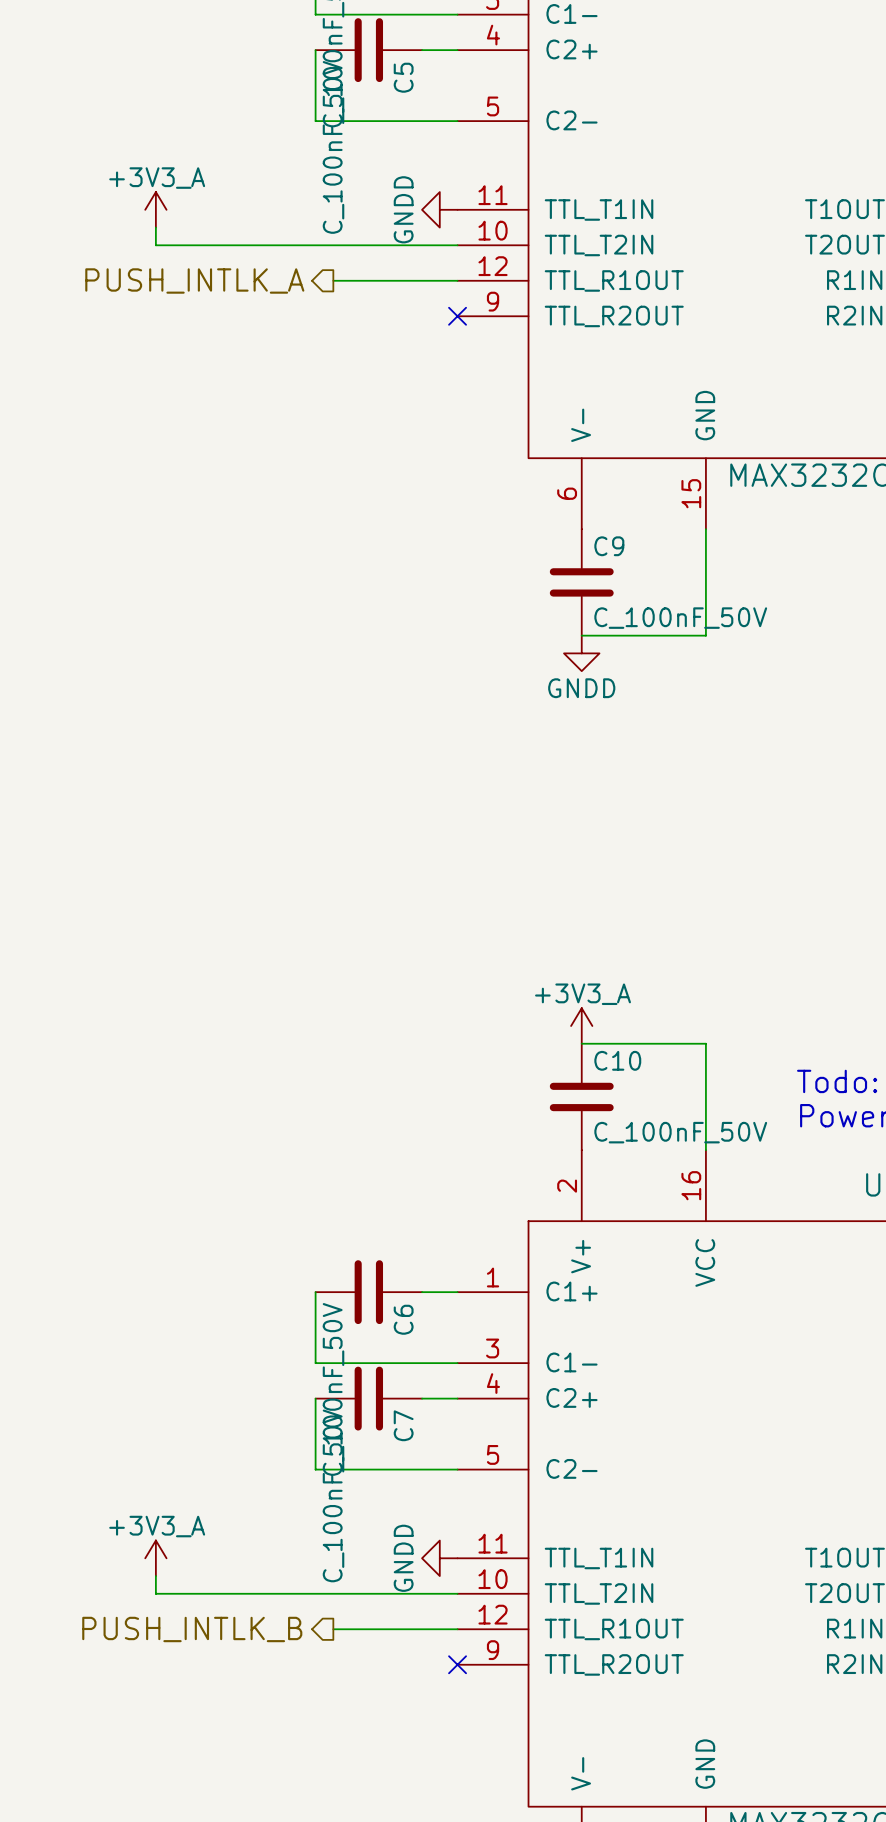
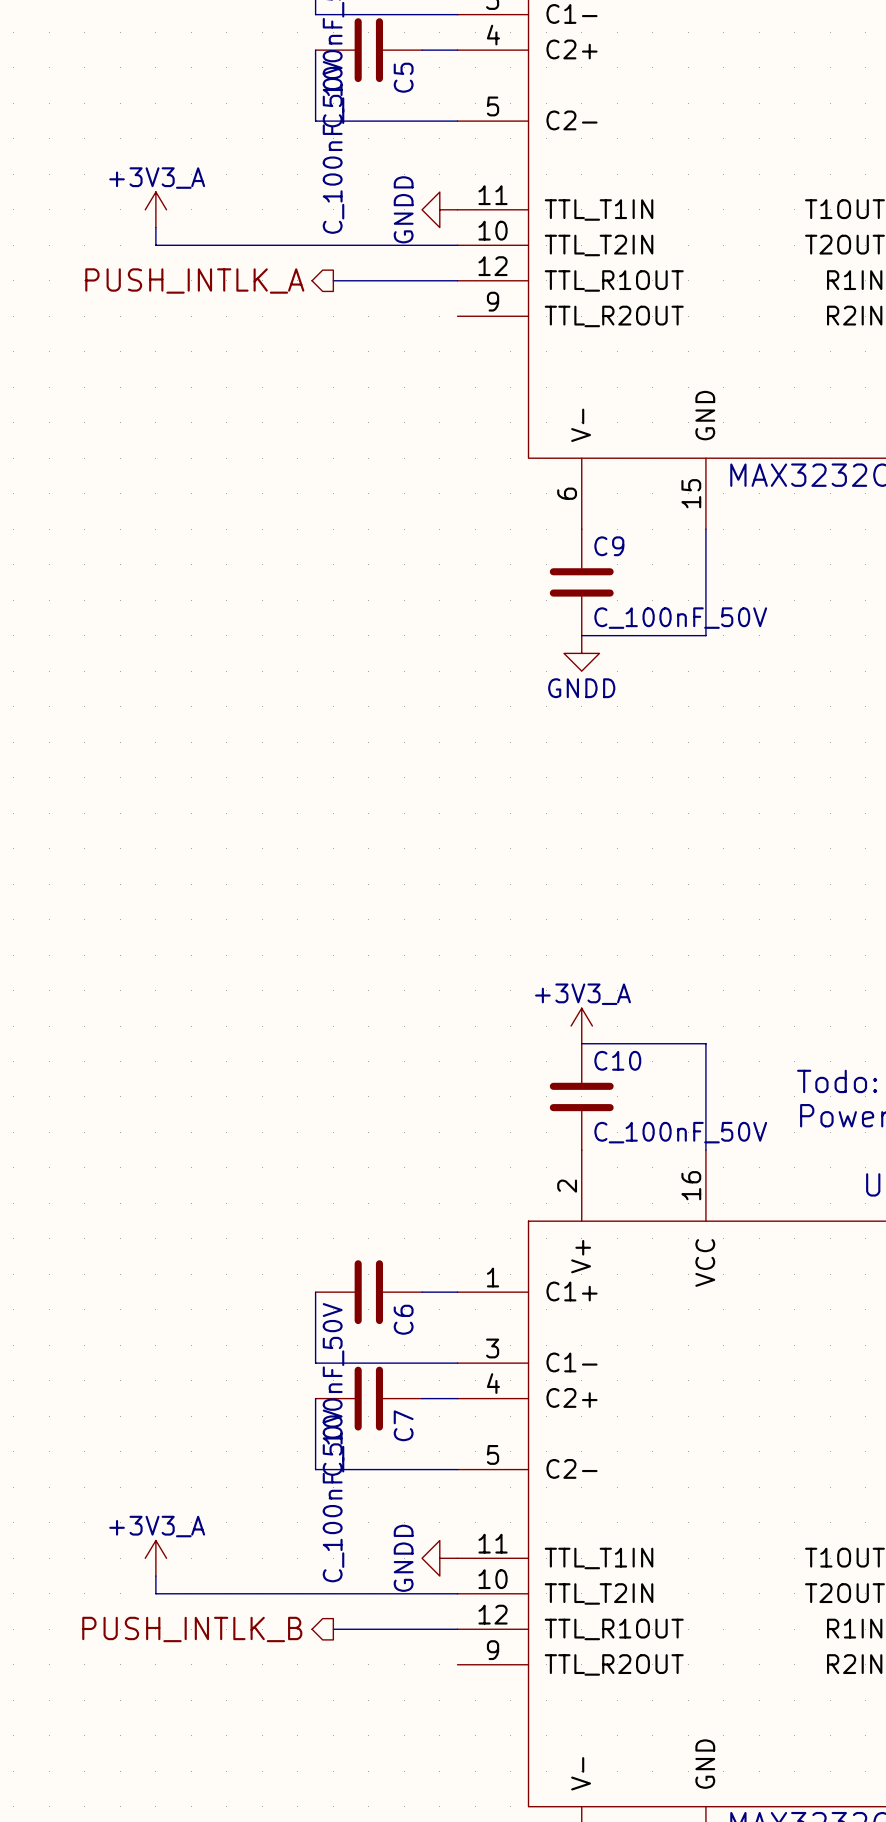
no-connect mark: (457, 316) -> none
no-connect mark: (457, 1664) -> none

